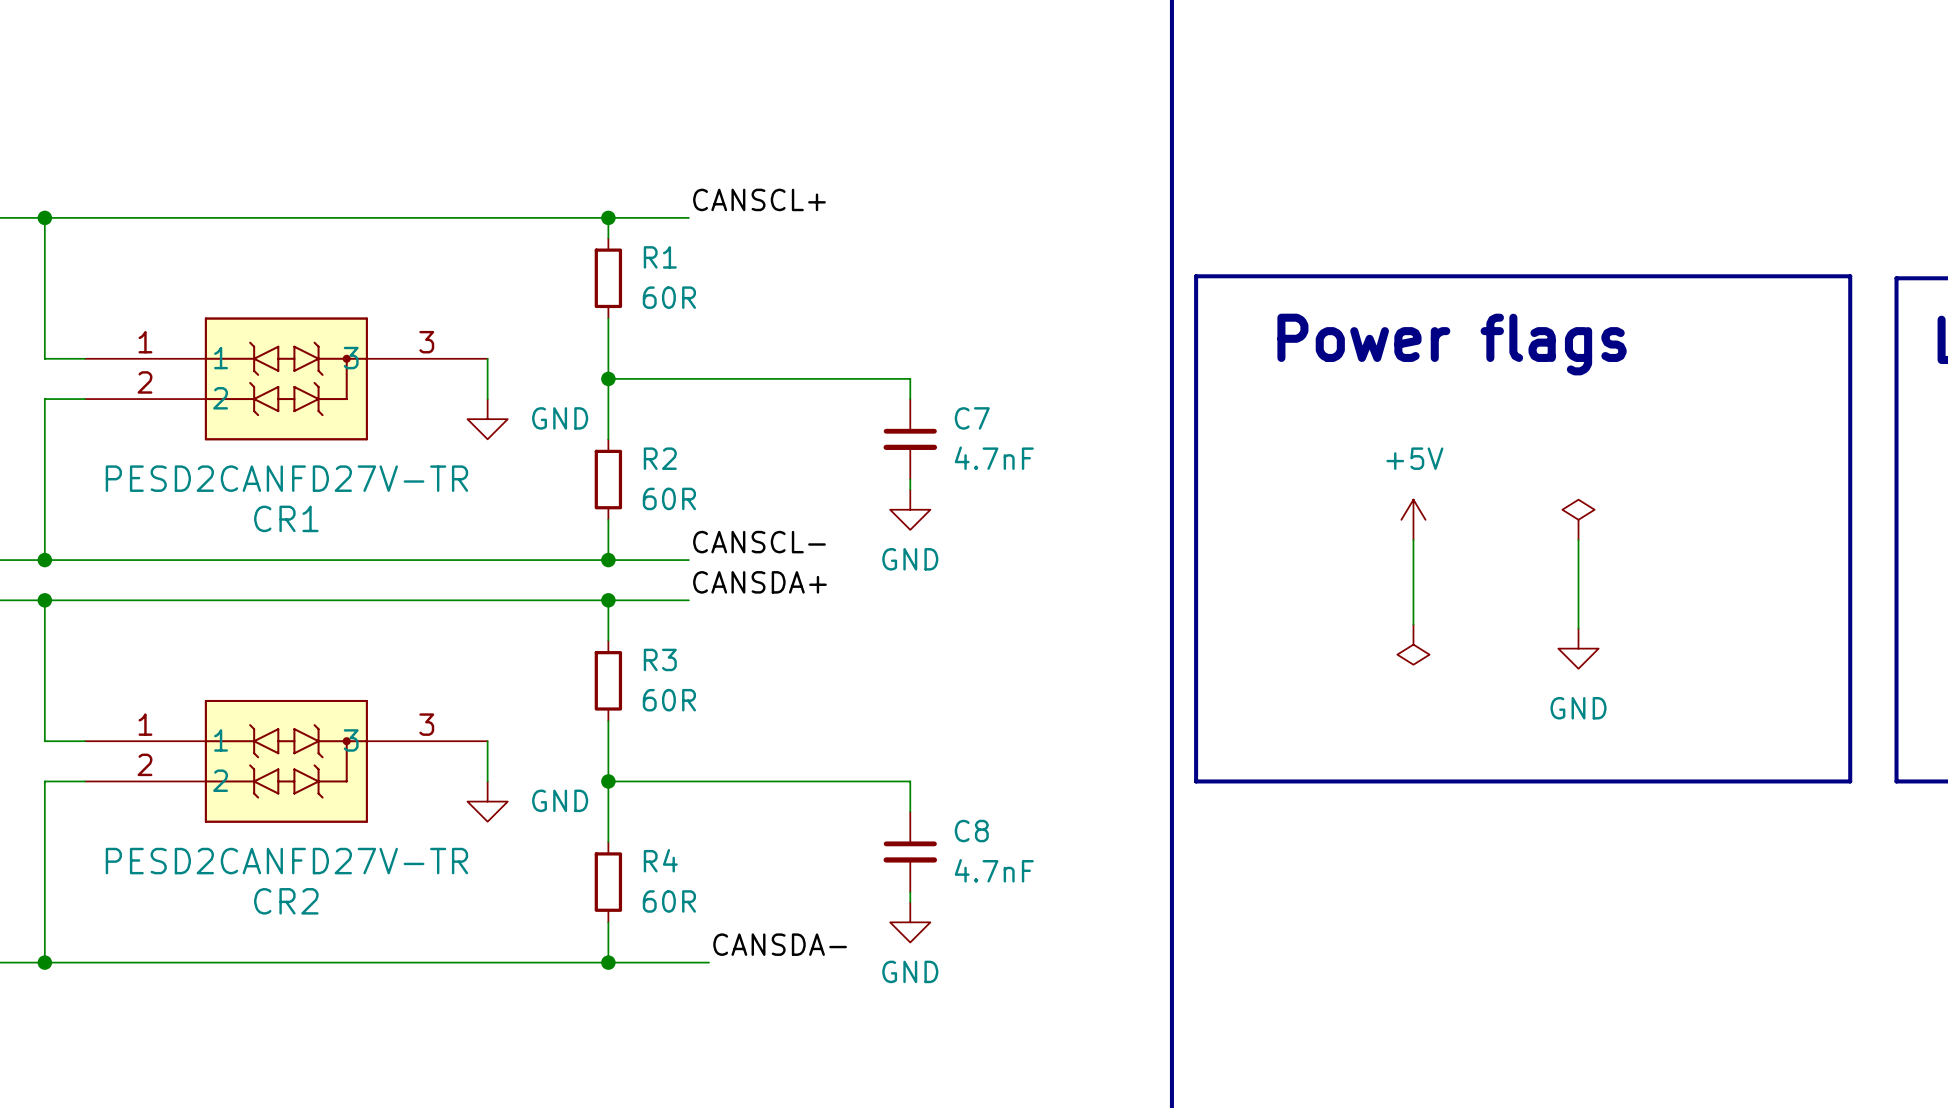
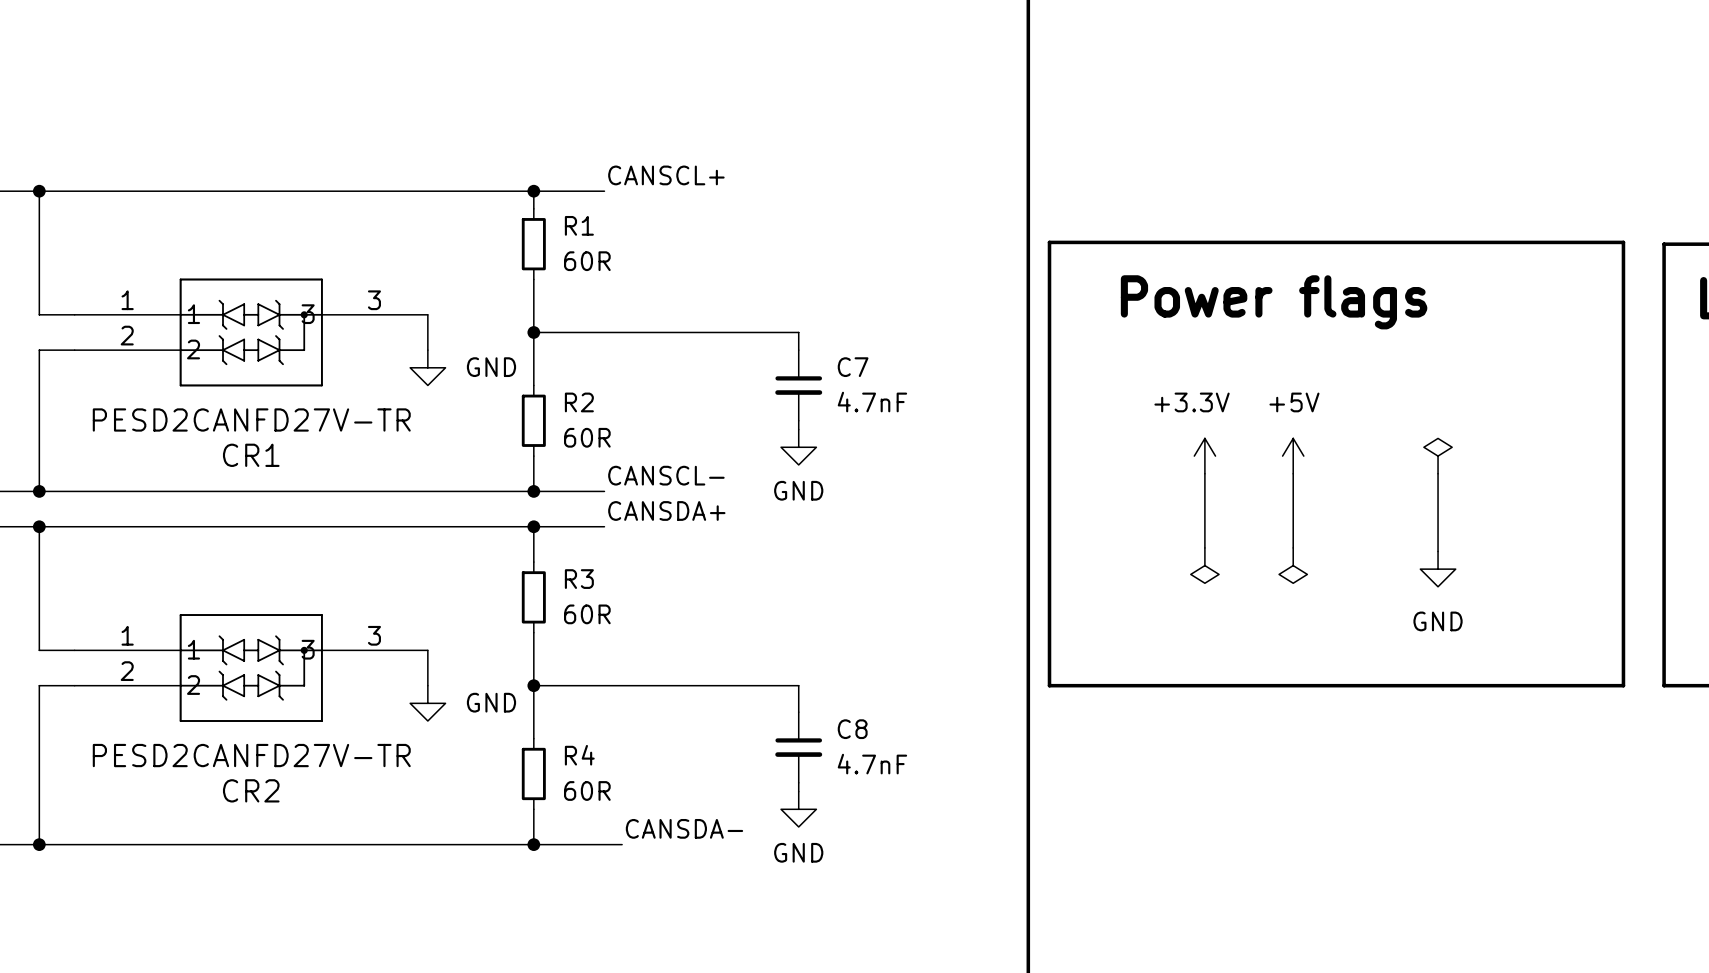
power symbol: none -> +3.3V (1204, 456)
power symbol position: +5V (1413, 519) -> +5V (1293, 456)
power symbol position: (1578, 519) -> (1438, 456)
wire: (1413, 539) (1413, 624) -> (1204, 473) (1204, 547)
wire: none -> (1293, 473) (1293, 547)
wire: (1578, 539) (1578, 628) -> (1438, 473) (1438, 551)
power symbol: none -> (1204, 565)
power symbol: (1413, 644) -> none
power symbol: none -> (1293, 565)
power symbol position: GND (1578, 648) -> GND (1438, 569)

